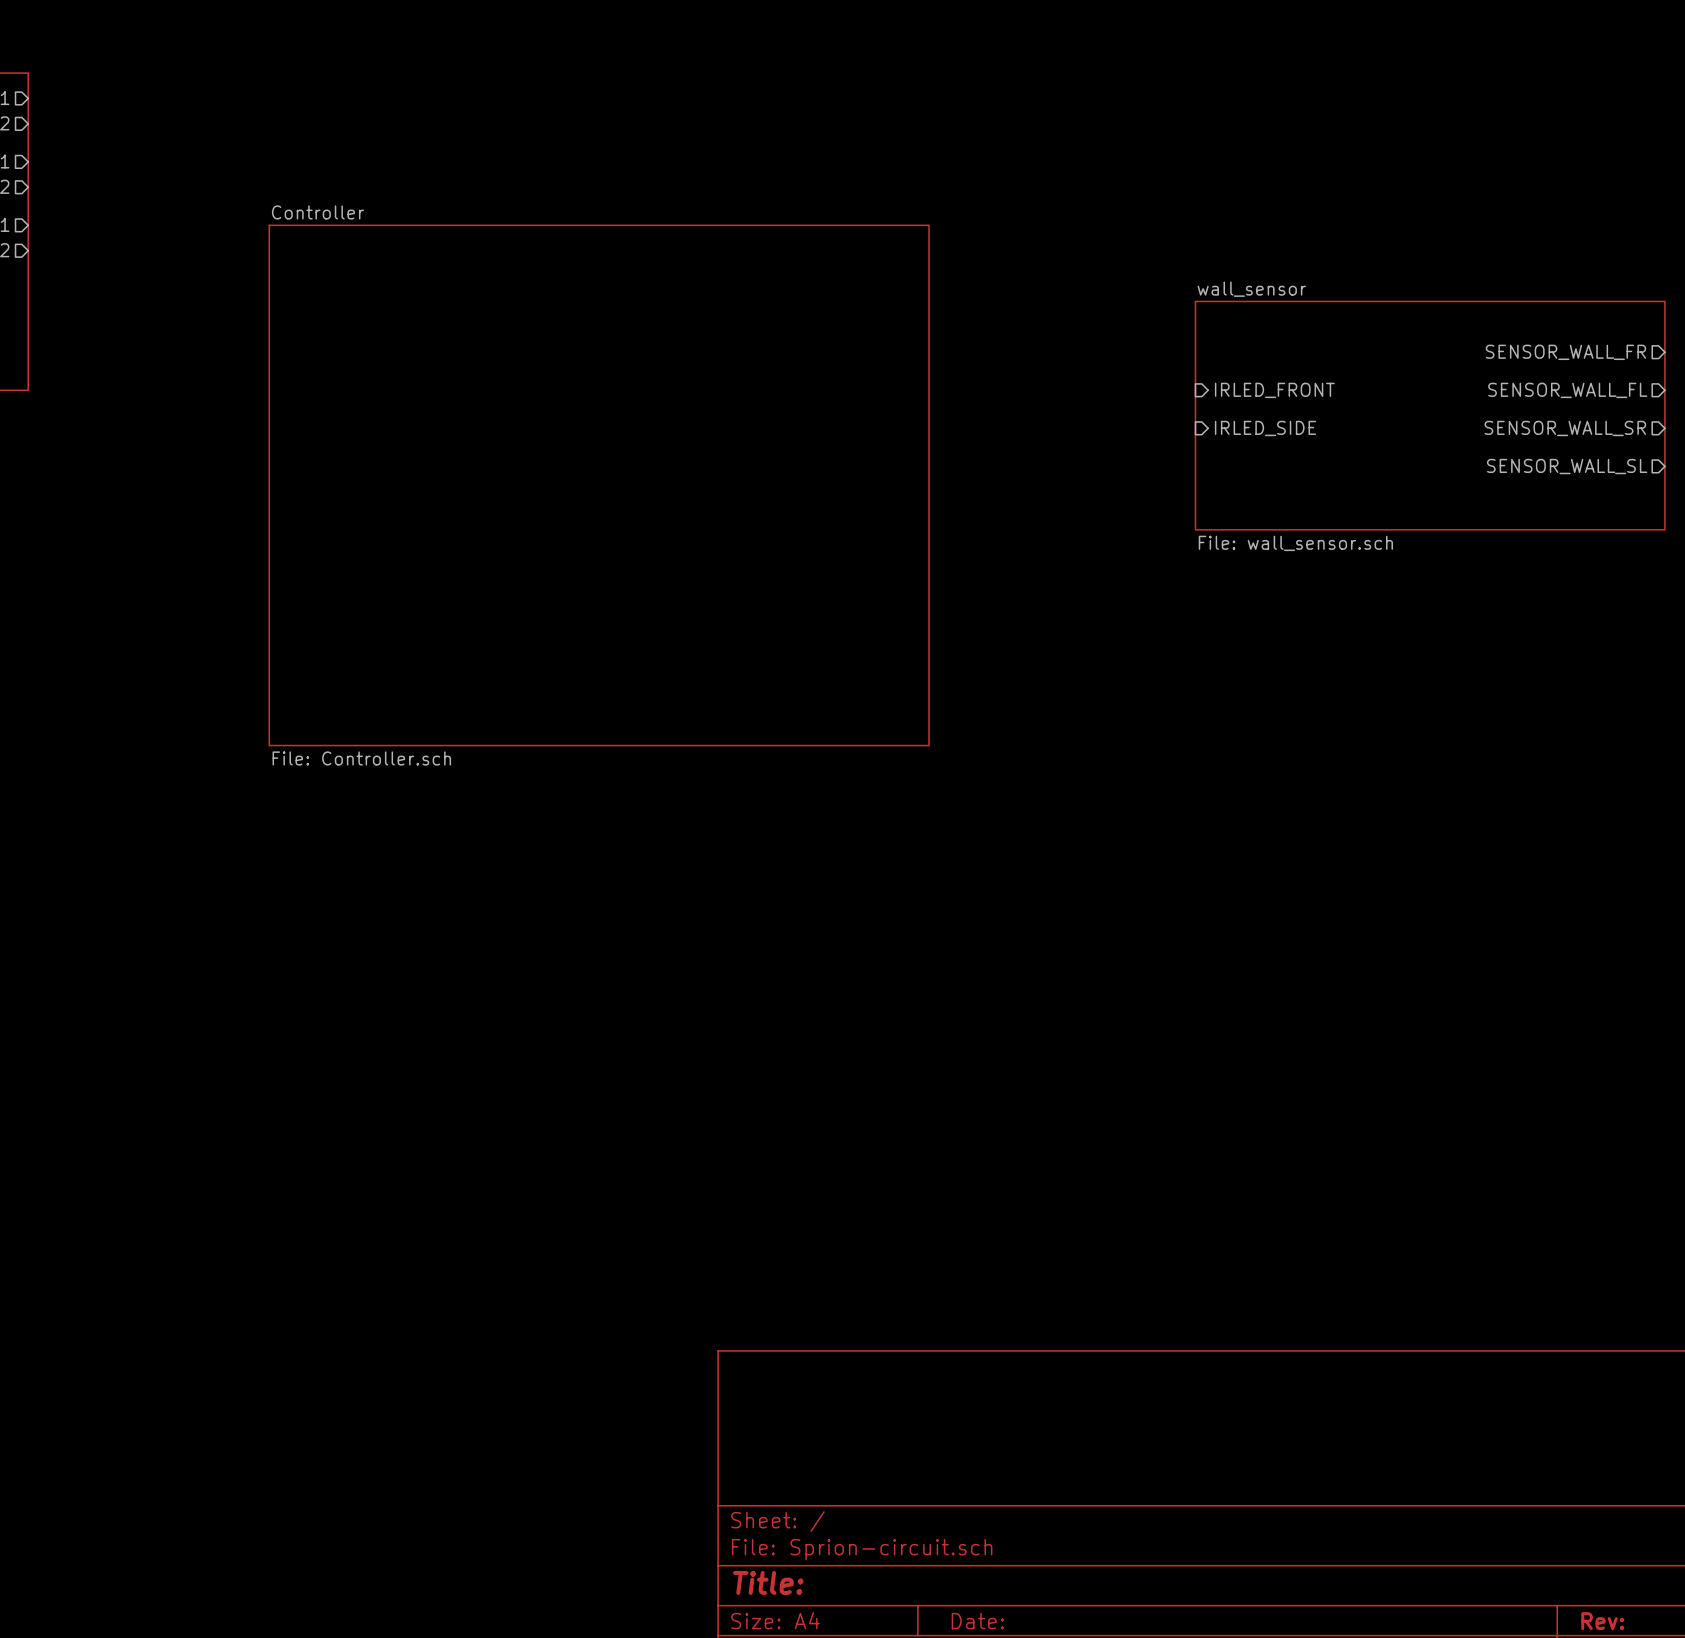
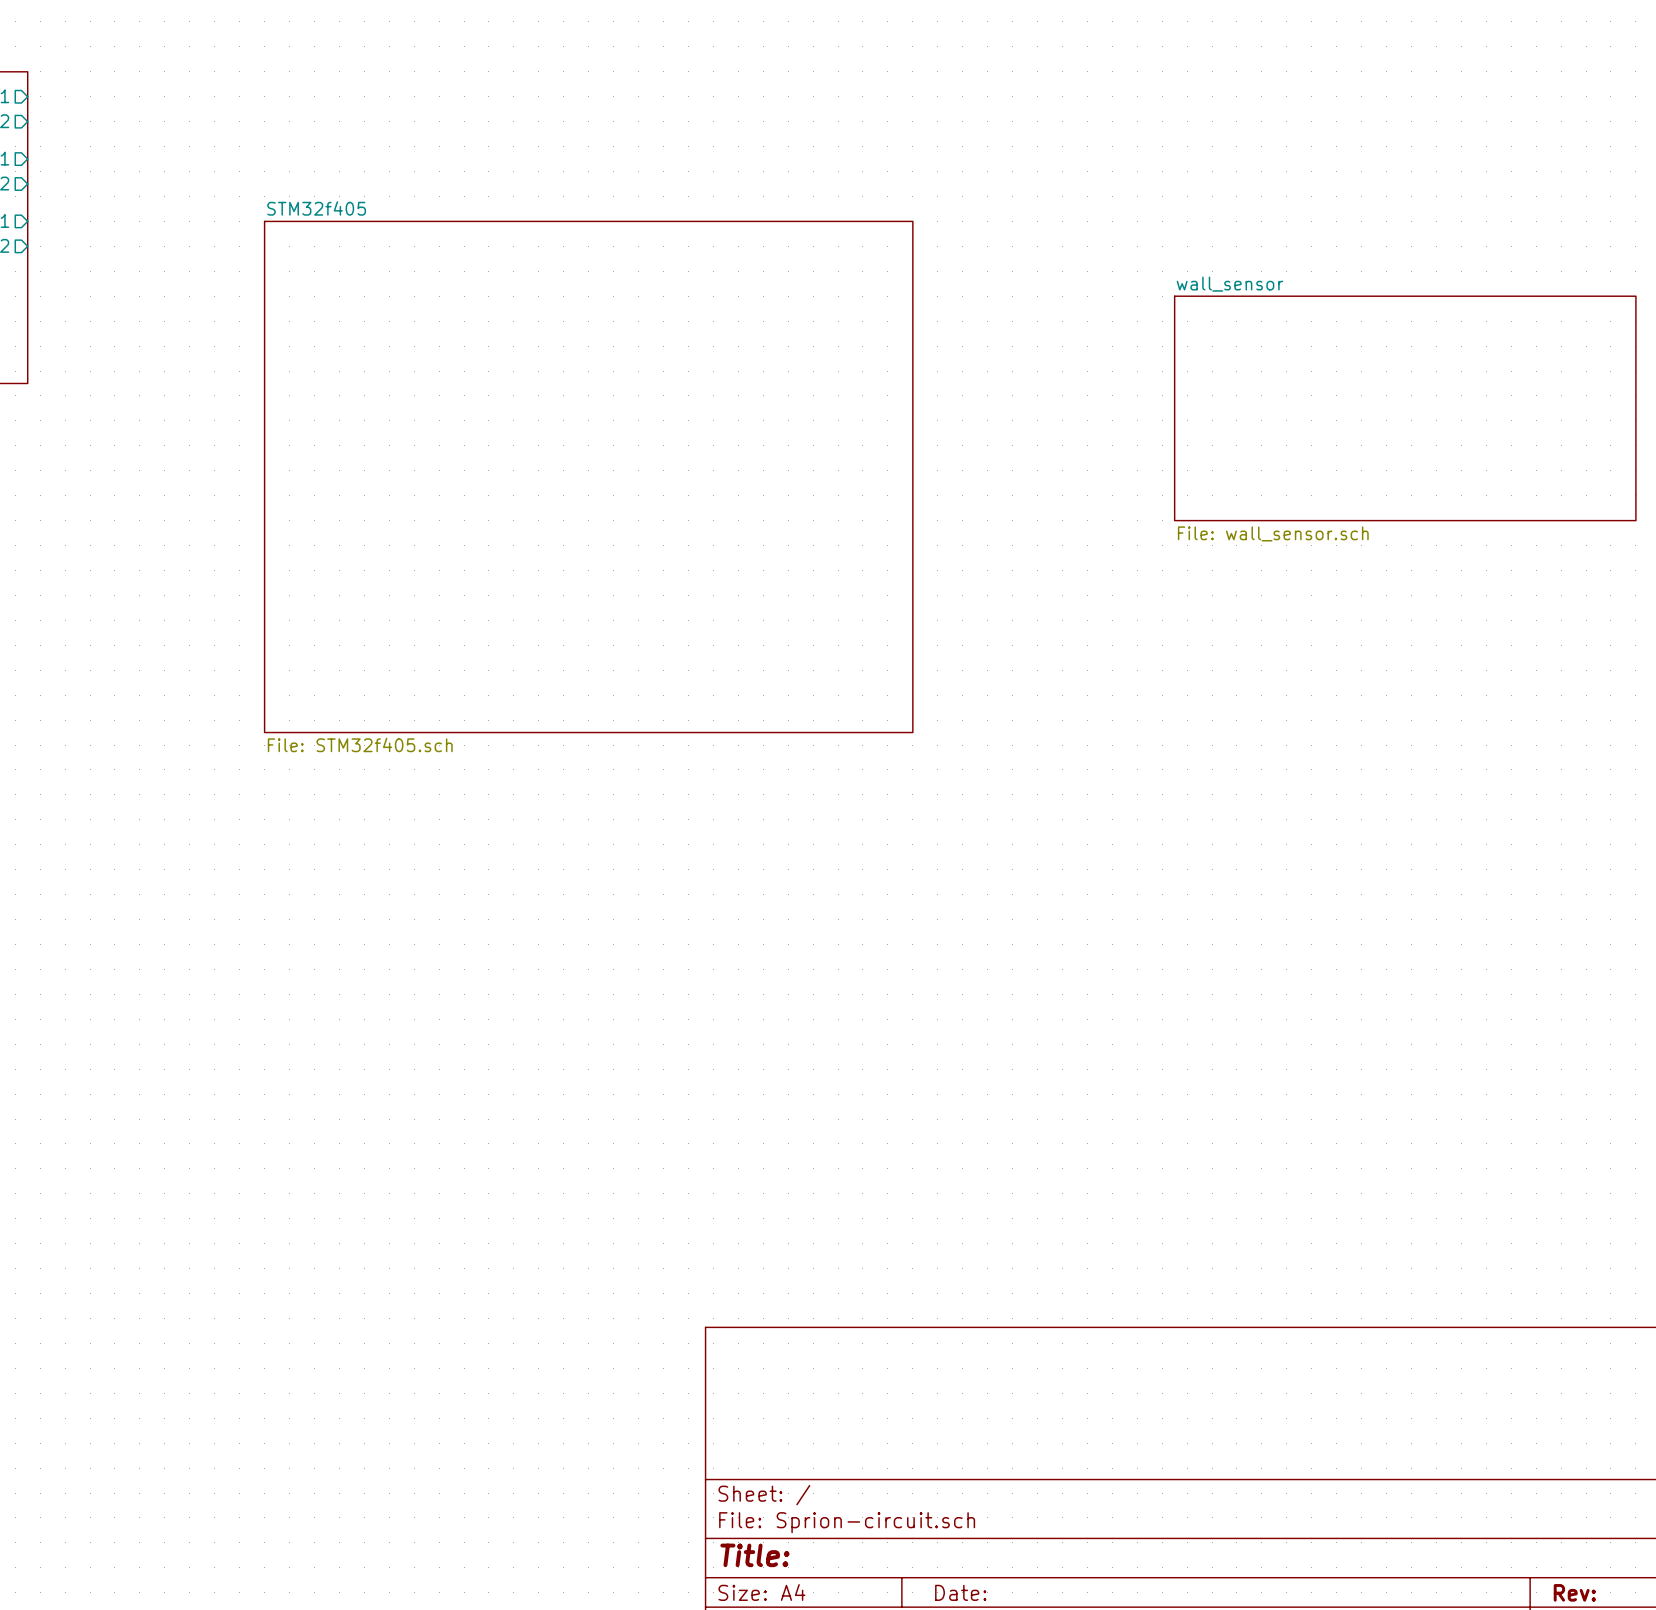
sheet Controller name: Controller (318, 212) -> STM32f405 (316, 208)
sheet pin: SENSOR_WALL_FR (1565, 352) -> none
sheet pin: IRLED_FRONT (1274, 390) -> none
sheet pin: SENSOR_WALL_FL (1567, 390) -> none
sheet pin: IRLED_SIDE (1265, 428) -> none
sheet pin: SENSOR_WALL_SR (1565, 428) -> none
sheet pin: SENSOR_WALL_SL (1567, 466) -> none
sheet Controller value: File: Controller.sch (361, 758) -> File: STM32f405.sch (360, 744)

